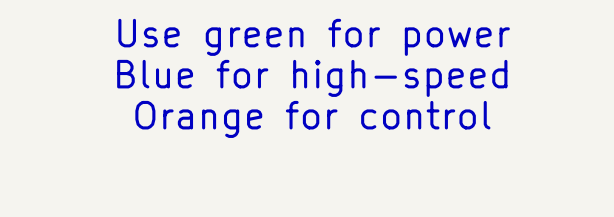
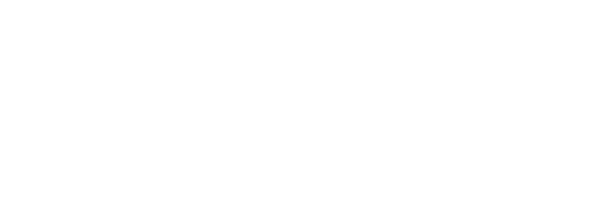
text: Use green for power (314, 37) -> none
text: Blue for high-speed (312, 78) -> none
text: Orange for control (312, 119) -> none

